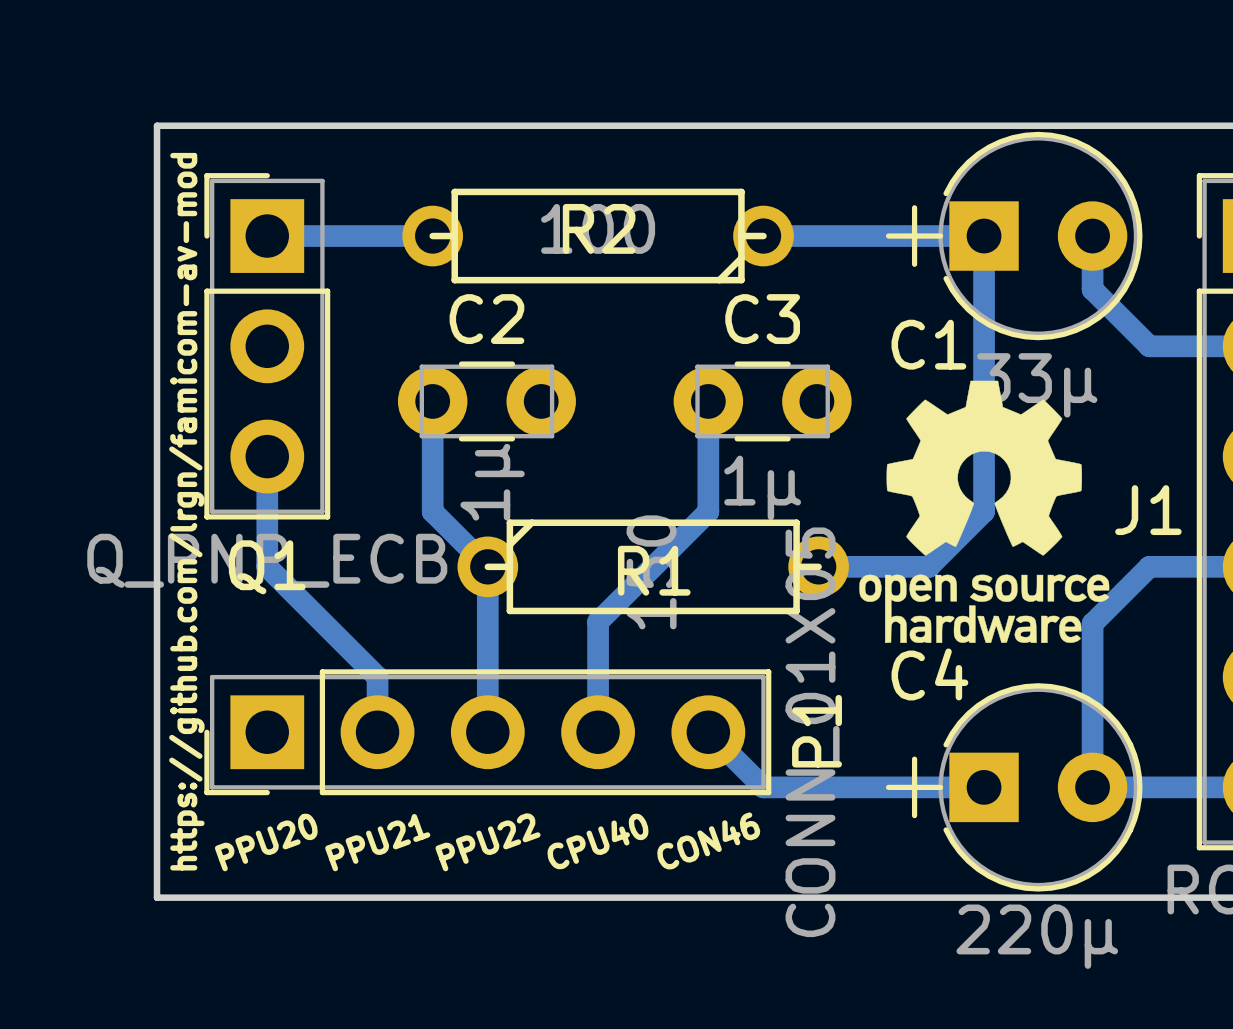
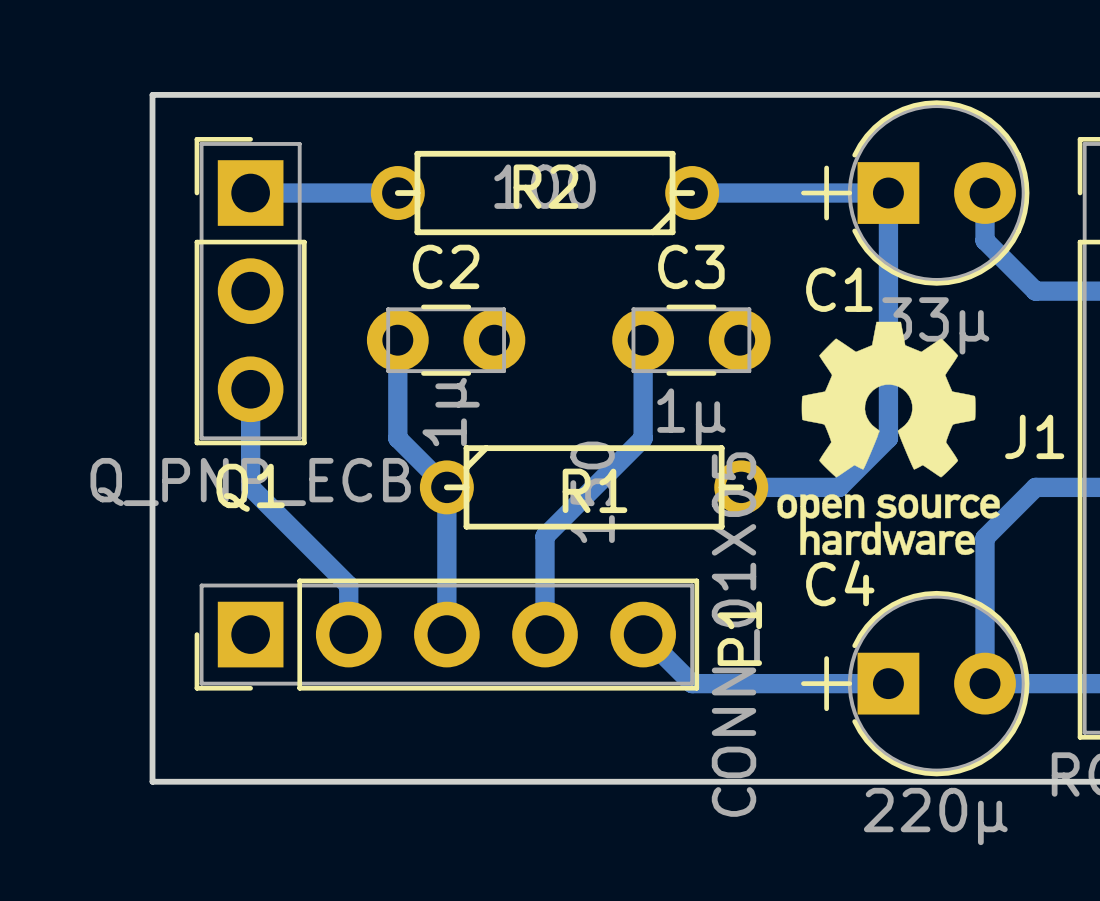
text: https://github.com/lrgn/famicom-av-mod (186, 511) -> none
text: CON46 (708, 840) -> none
text: CPU40 (597, 841) -> none
text: PPU20 (266, 842) -> none
text: PPU21 (377, 842) -> none
text: PPU22 (488, 842) -> none

